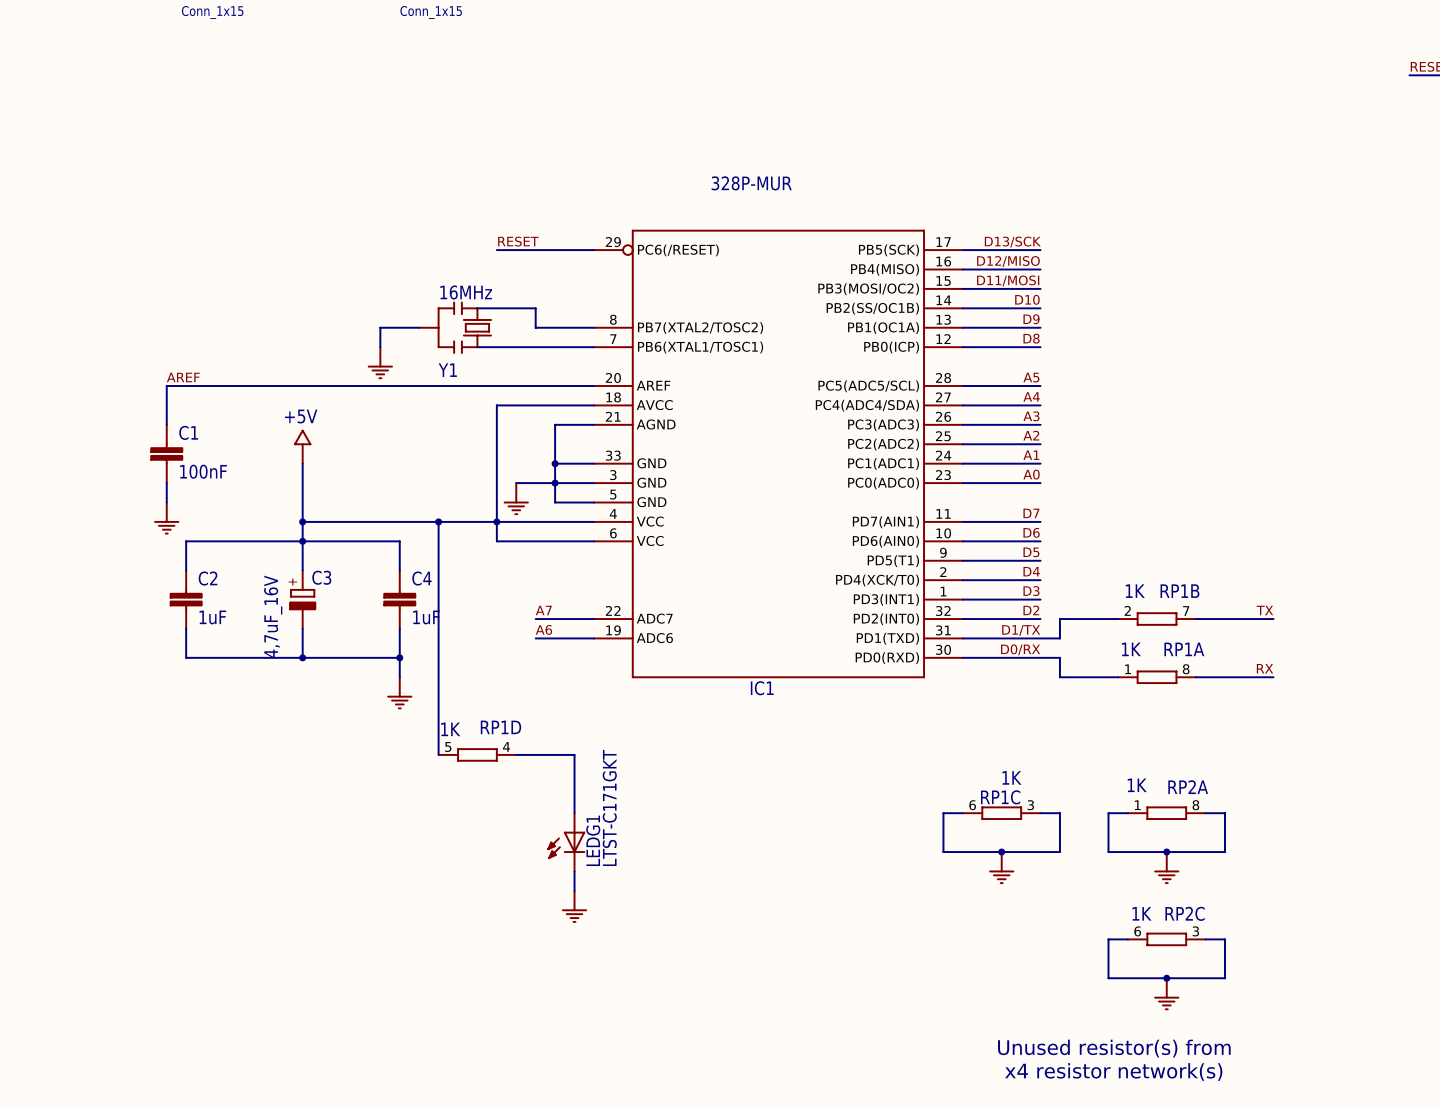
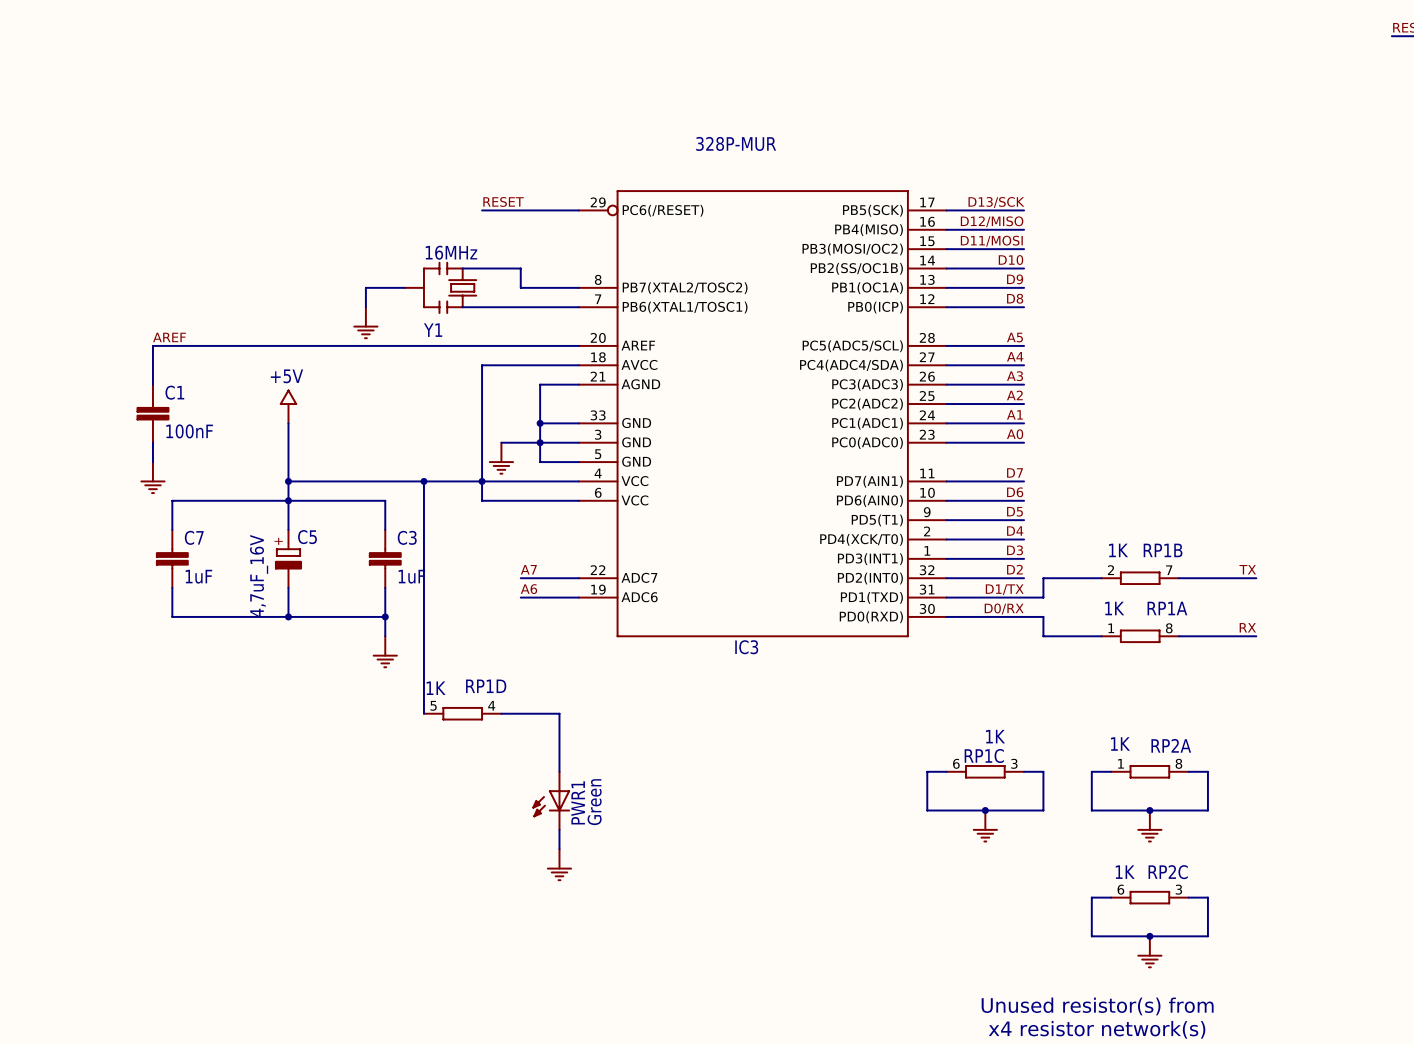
C3 name: C3 (321, 577) -> C5 (307, 537)
C2 name: C2 (208, 578) -> C7 (194, 537)
C4 name: C4 (421, 578) -> C3 (407, 537)
IC1 name: IC1 (762, 688) -> IC3 (746, 647)
LEDG1 value: LTST-C171GKT (609, 807) -> Green (594, 802)
LEDG1 name: LEDG1 (593, 840) -> PWR1 (578, 802)

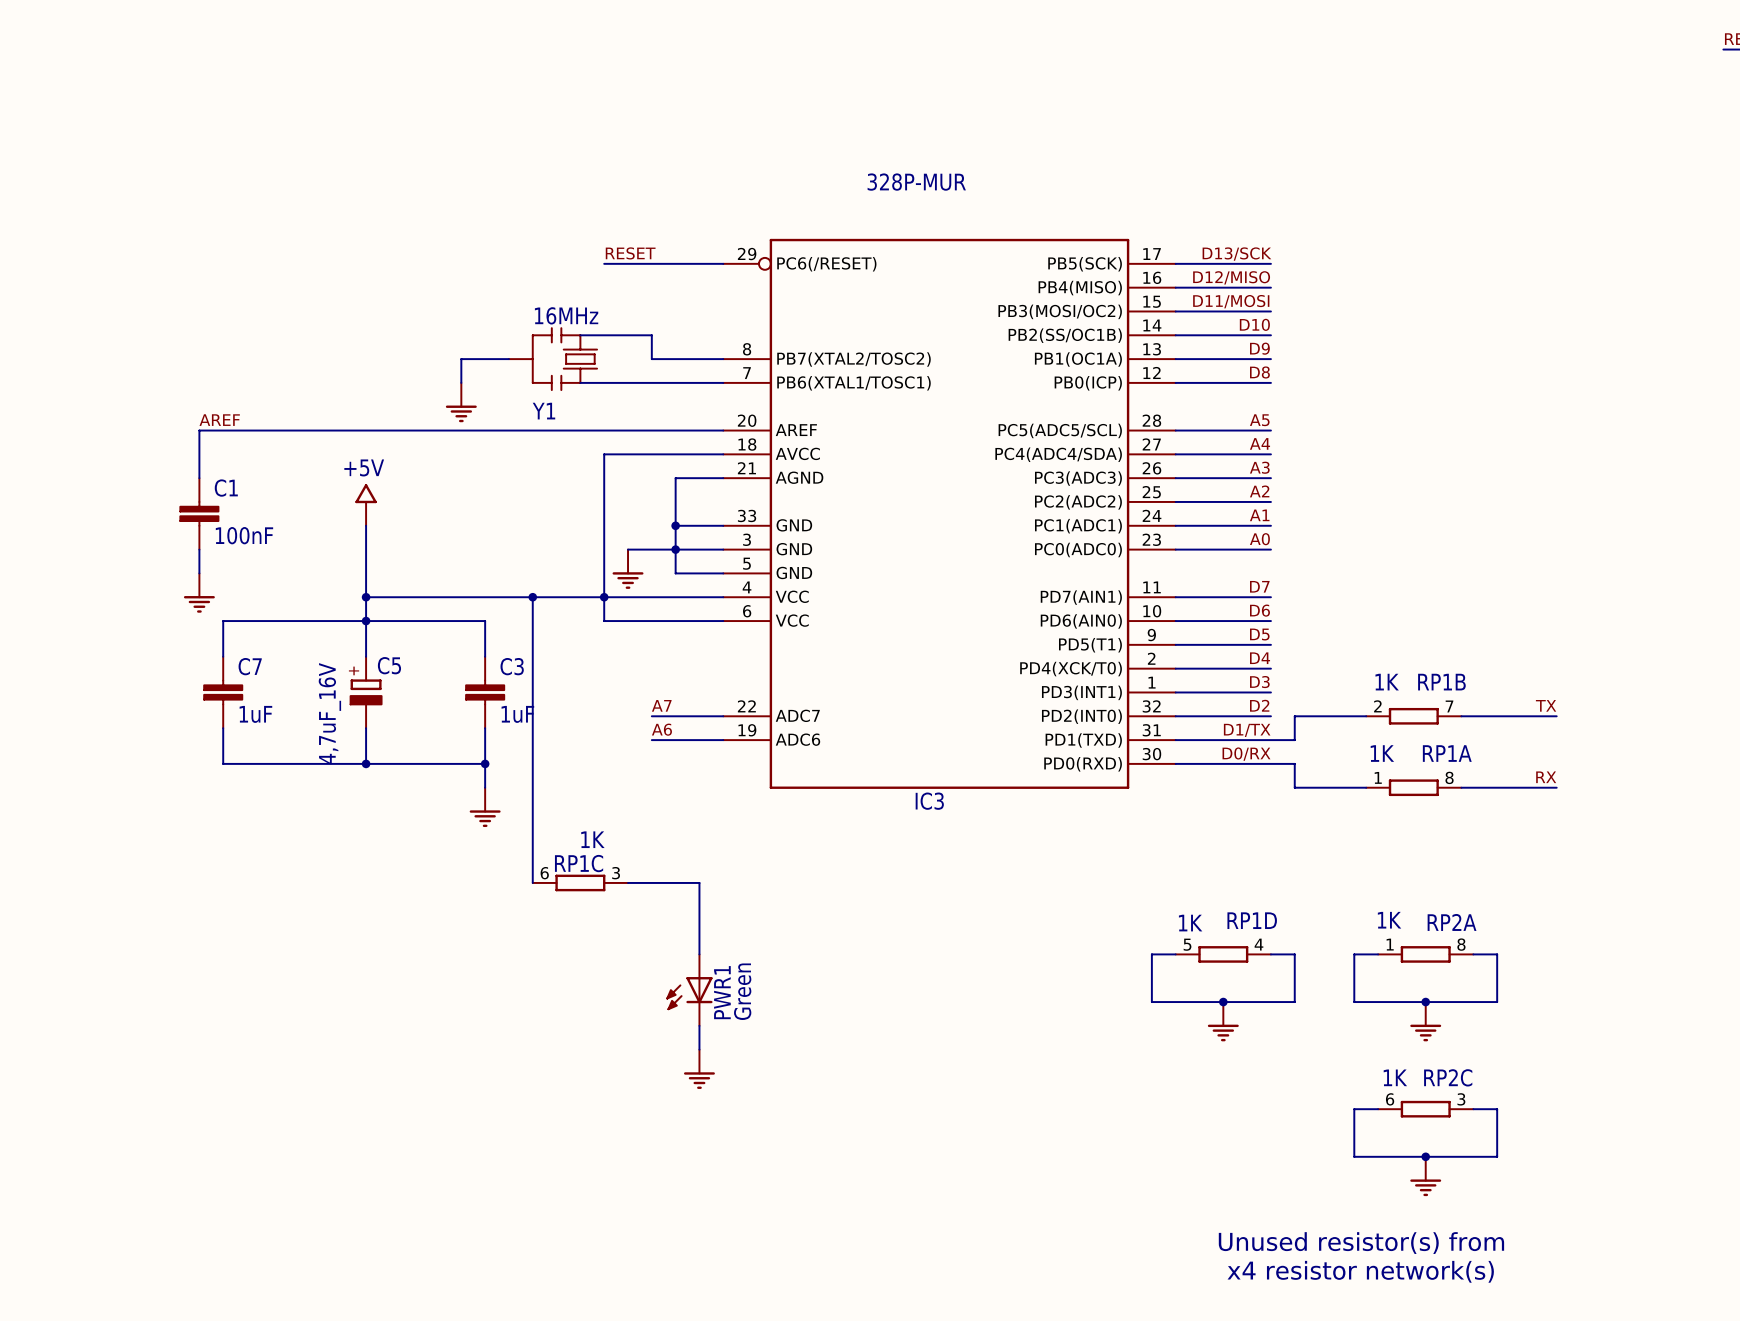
RP1D position: (462, 713) -> (1223, 954)
RP1C position: (985, 771) -> (580, 882)

